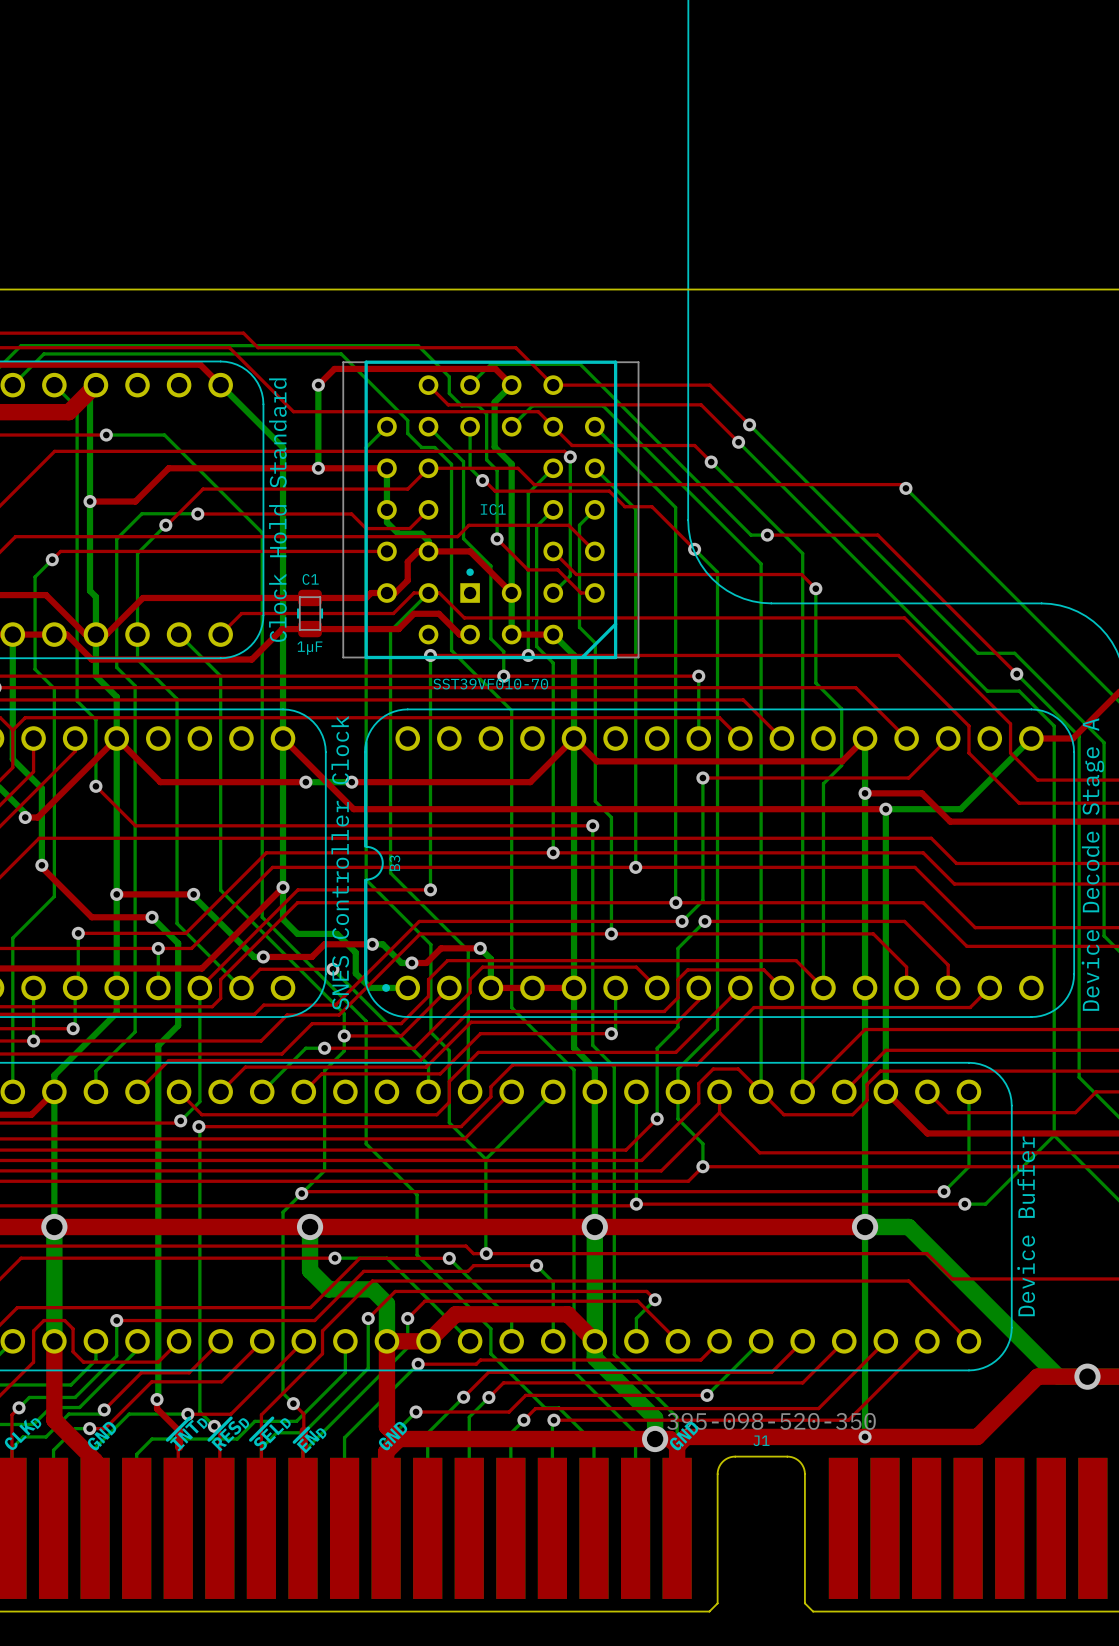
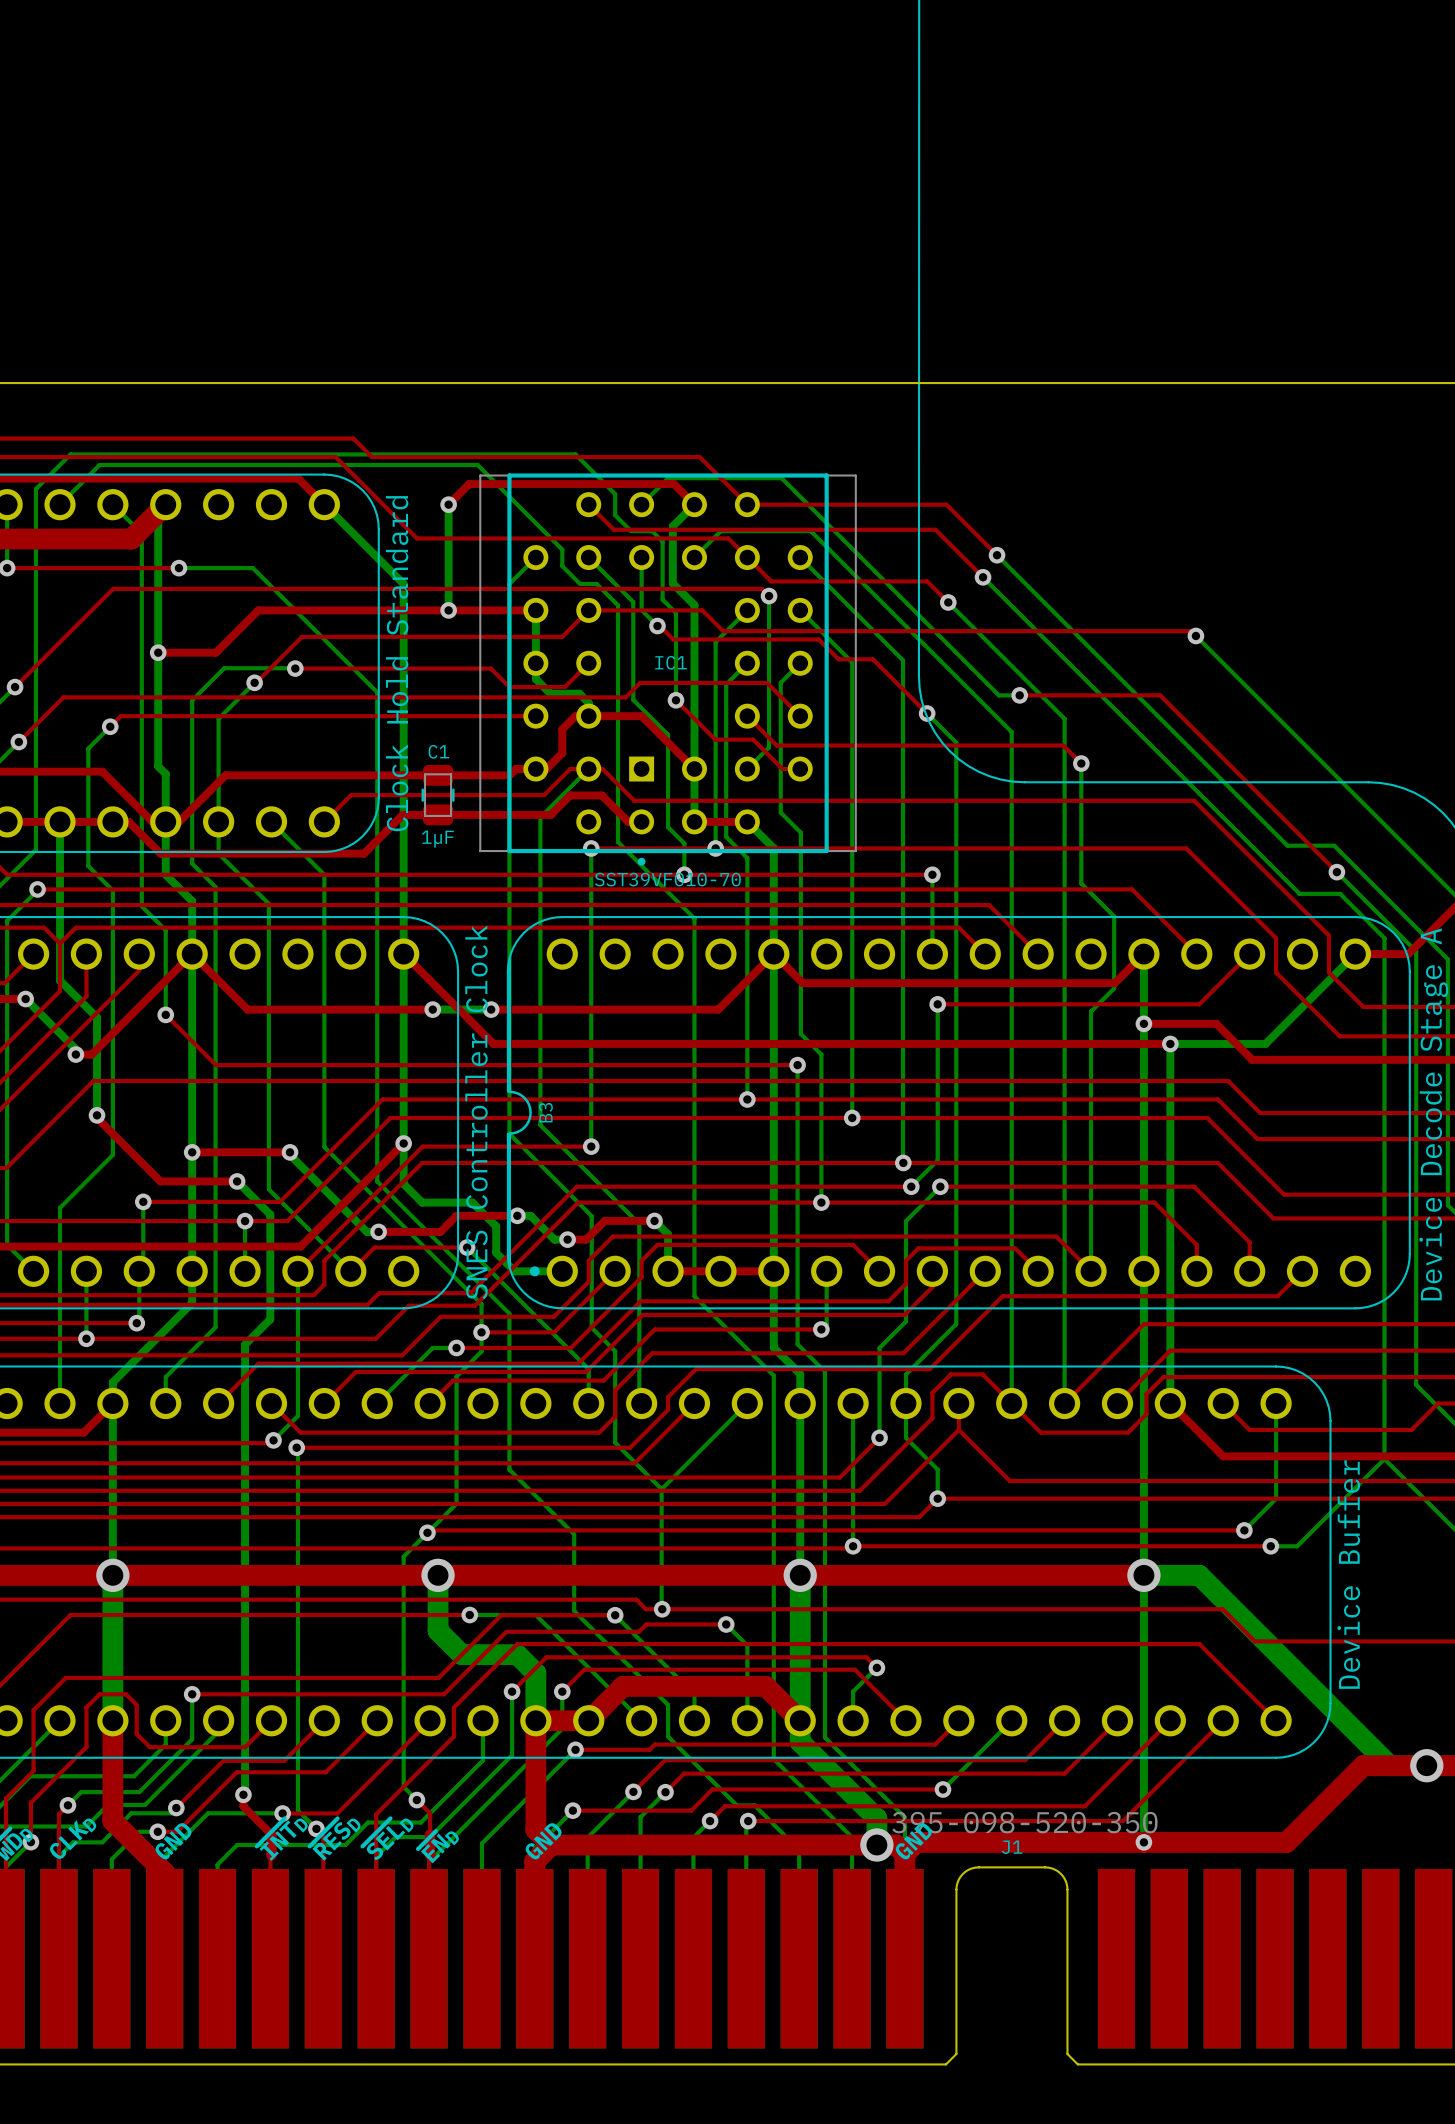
IC1 footprint: [342, 360, 640, 660] -> [479, 473, 857, 866]

